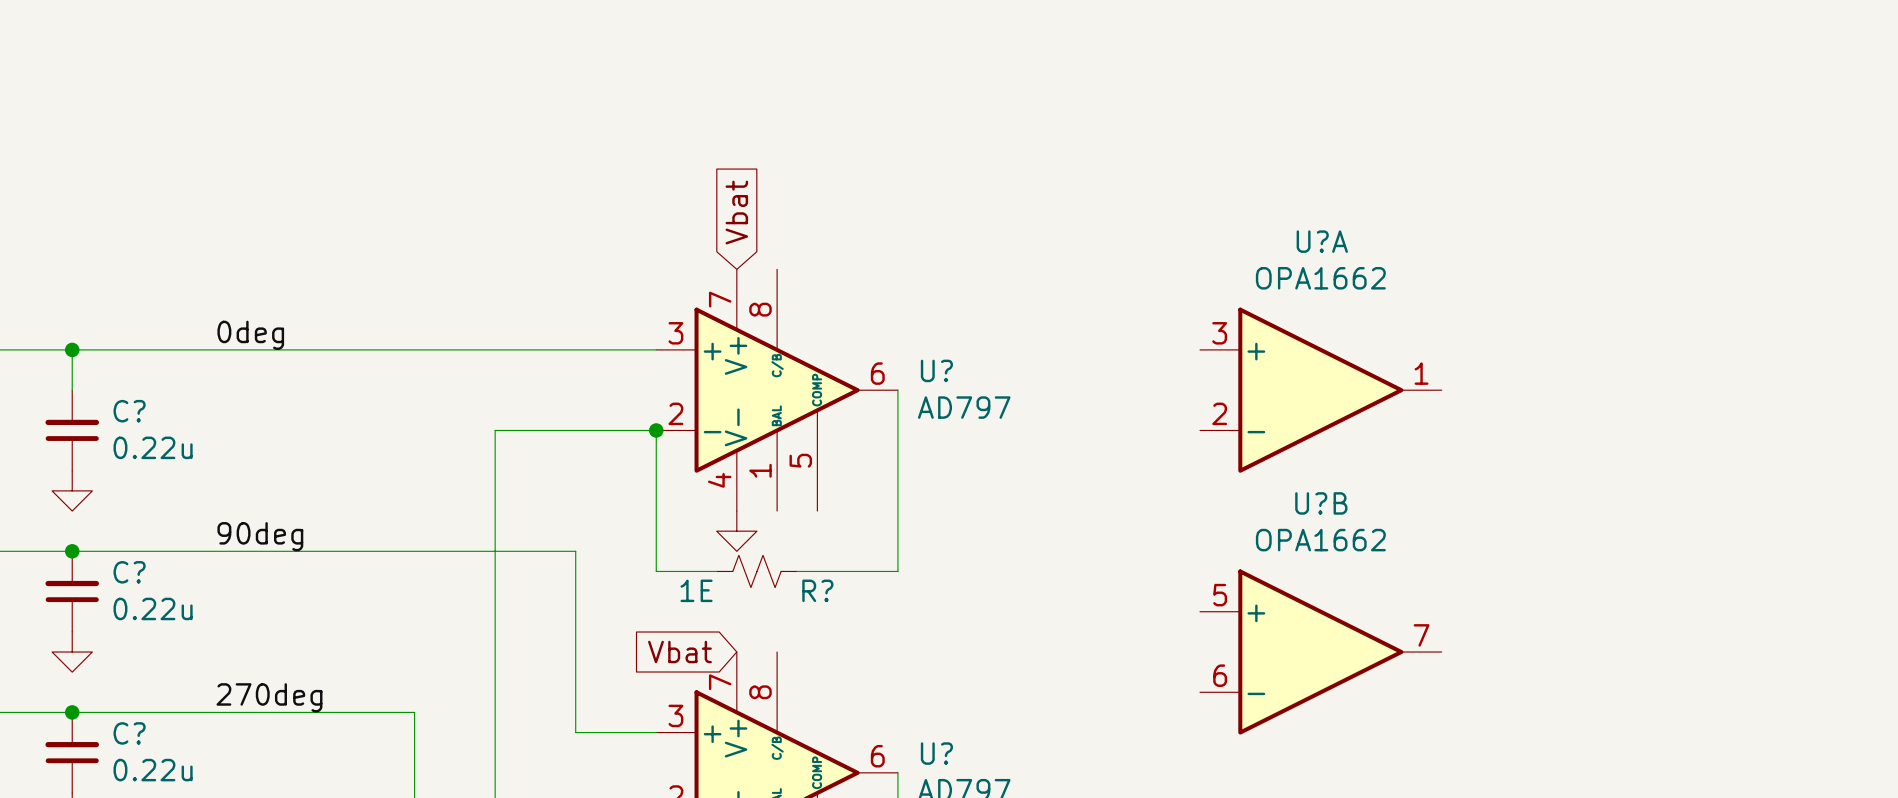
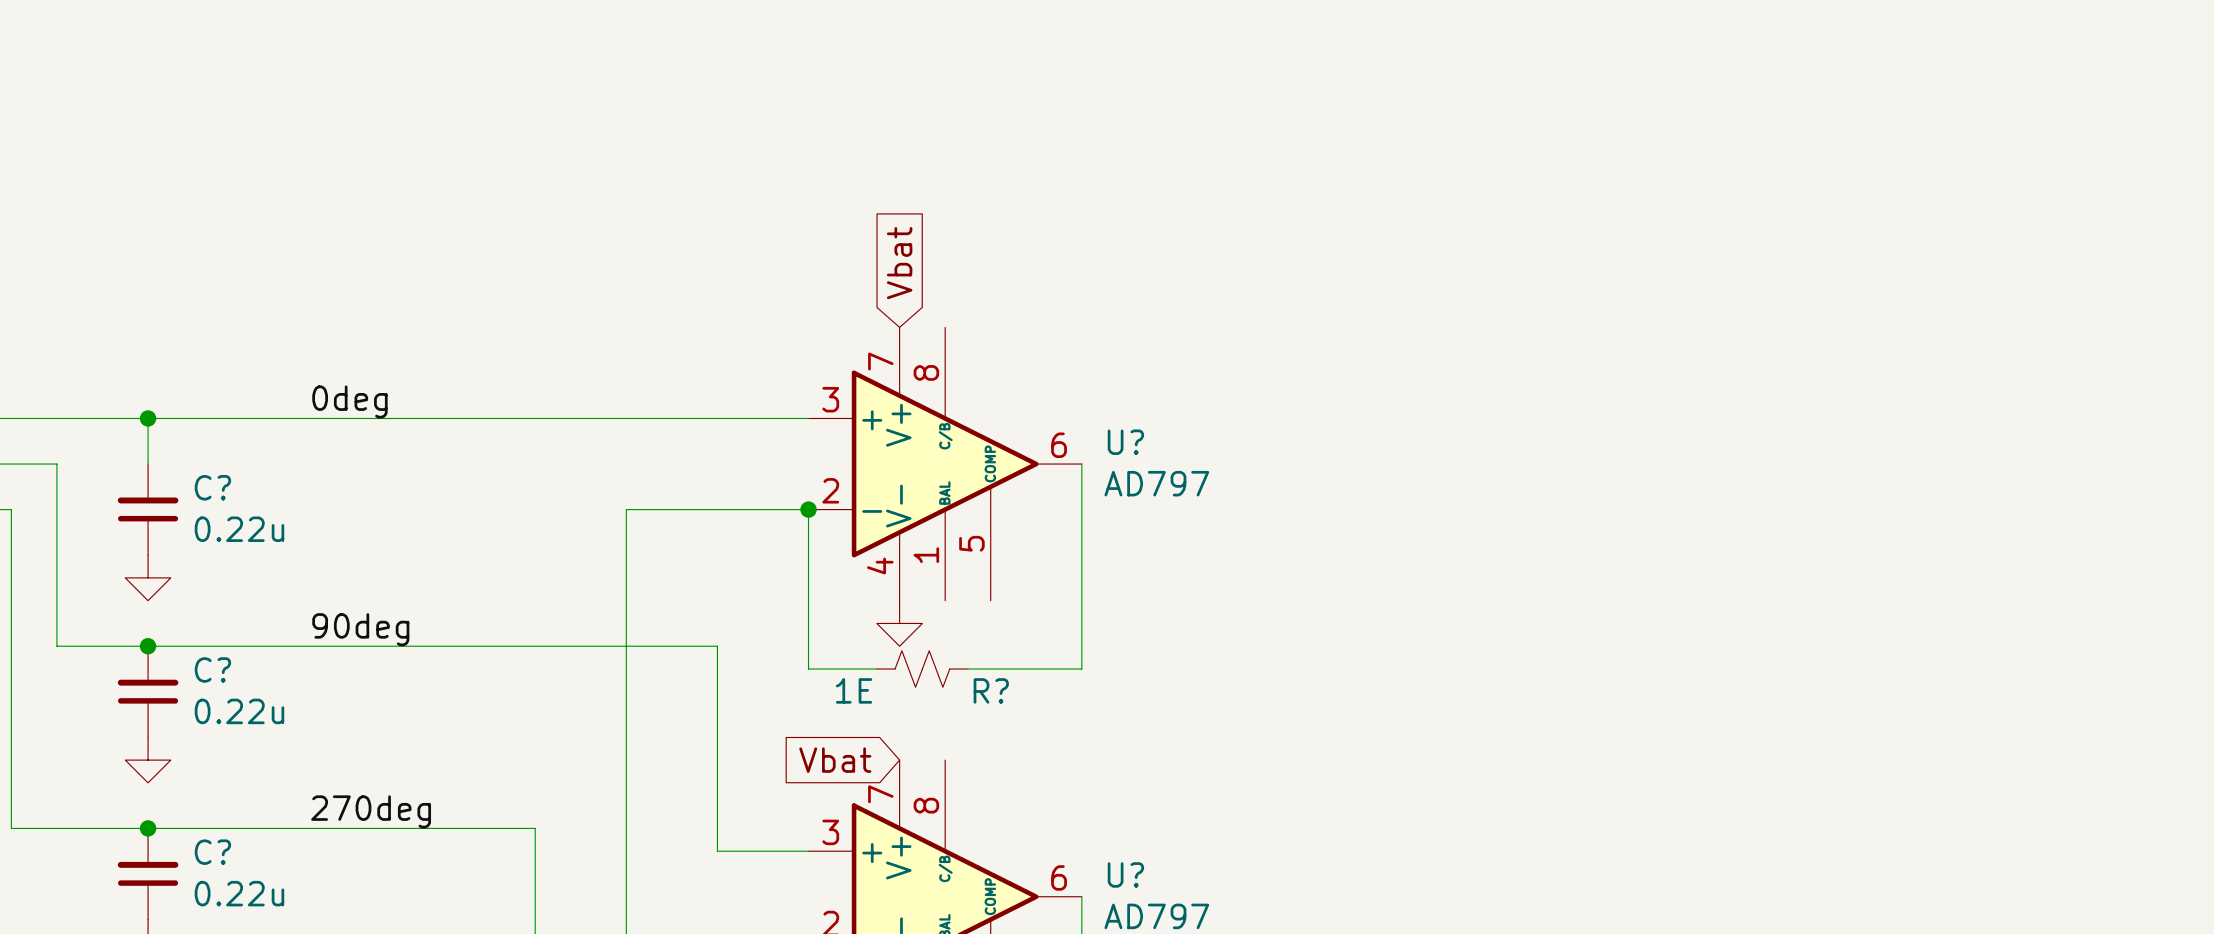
U?A: OPA1662 (1320, 390) -> none
U?B: OPA1662 (1320, 652) -> none

